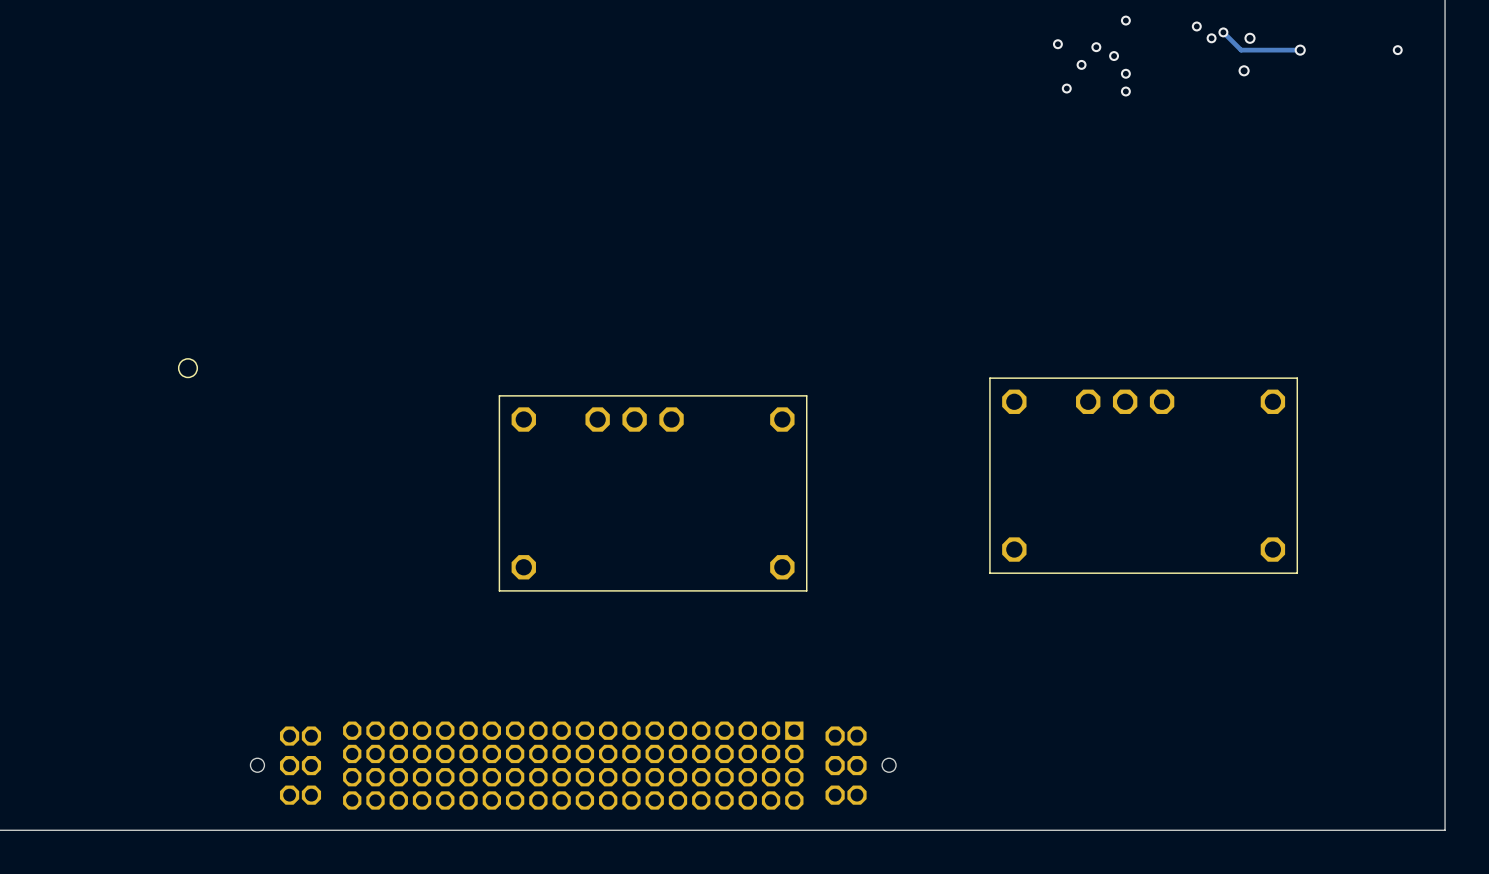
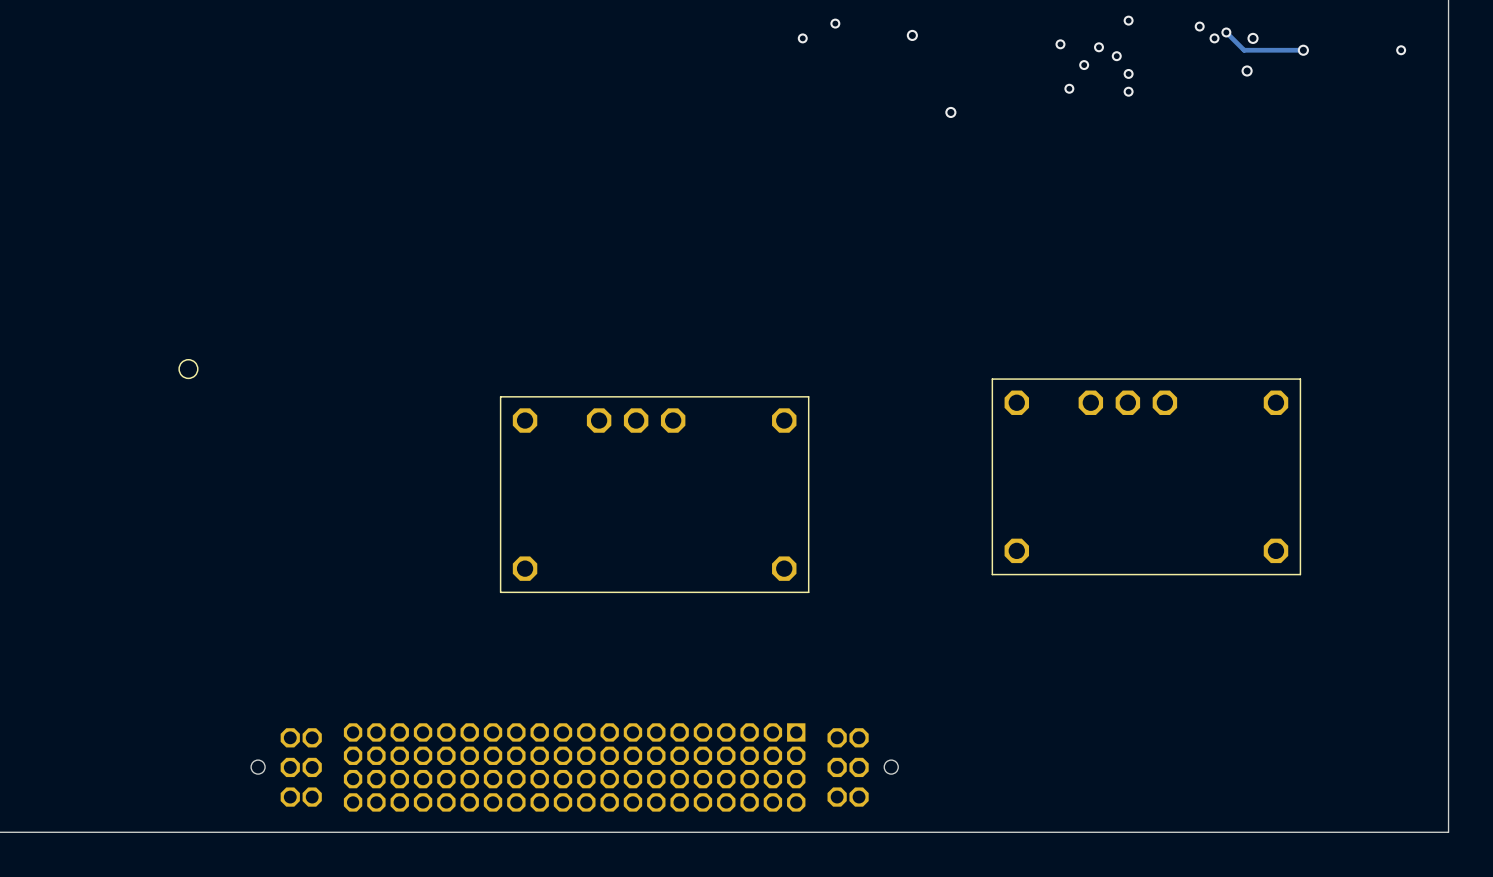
via: none -> (835, 23)
via: none -> (912, 35)
via: none -> (802, 38)
via: none -> (950, 112)

